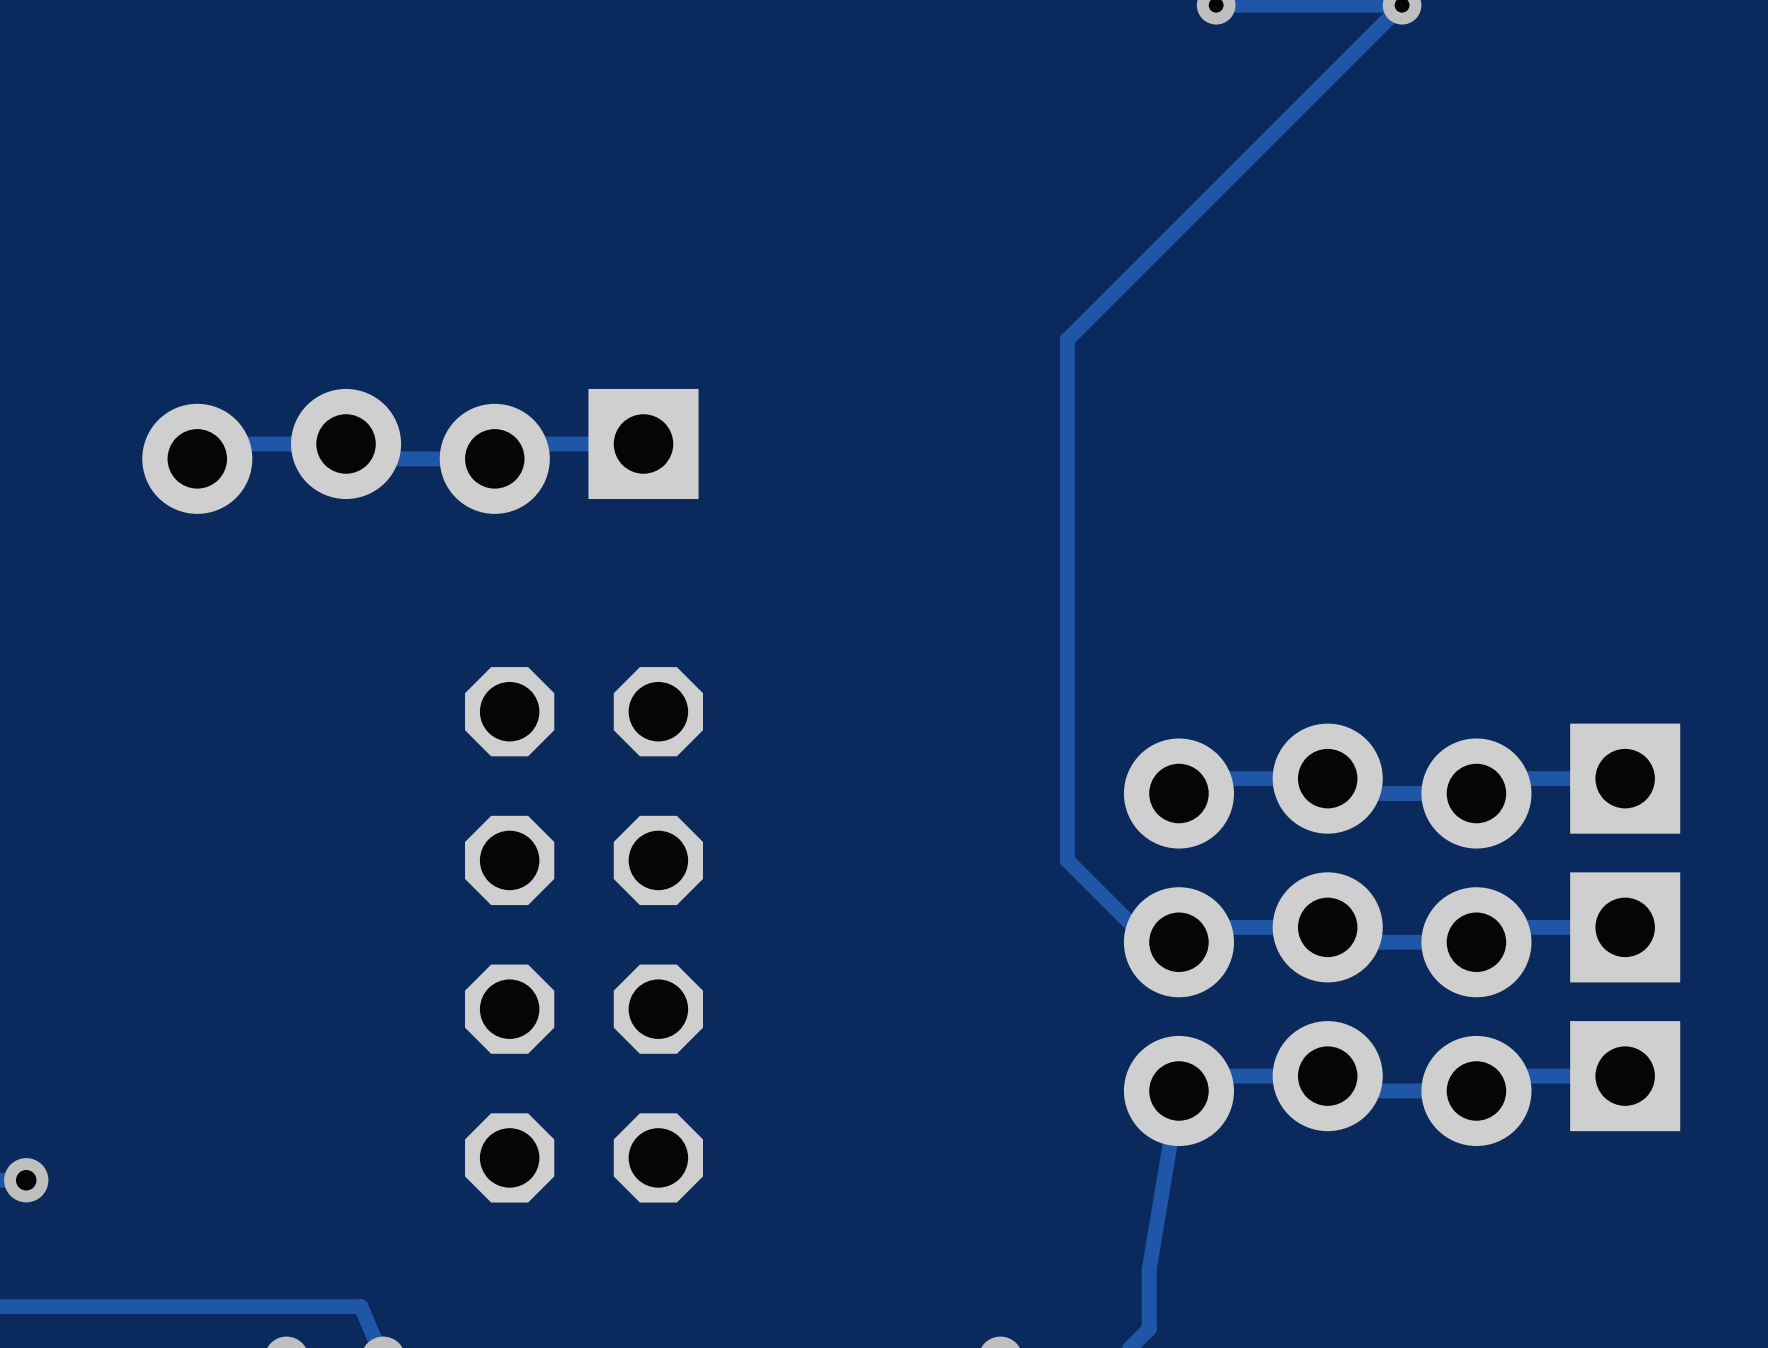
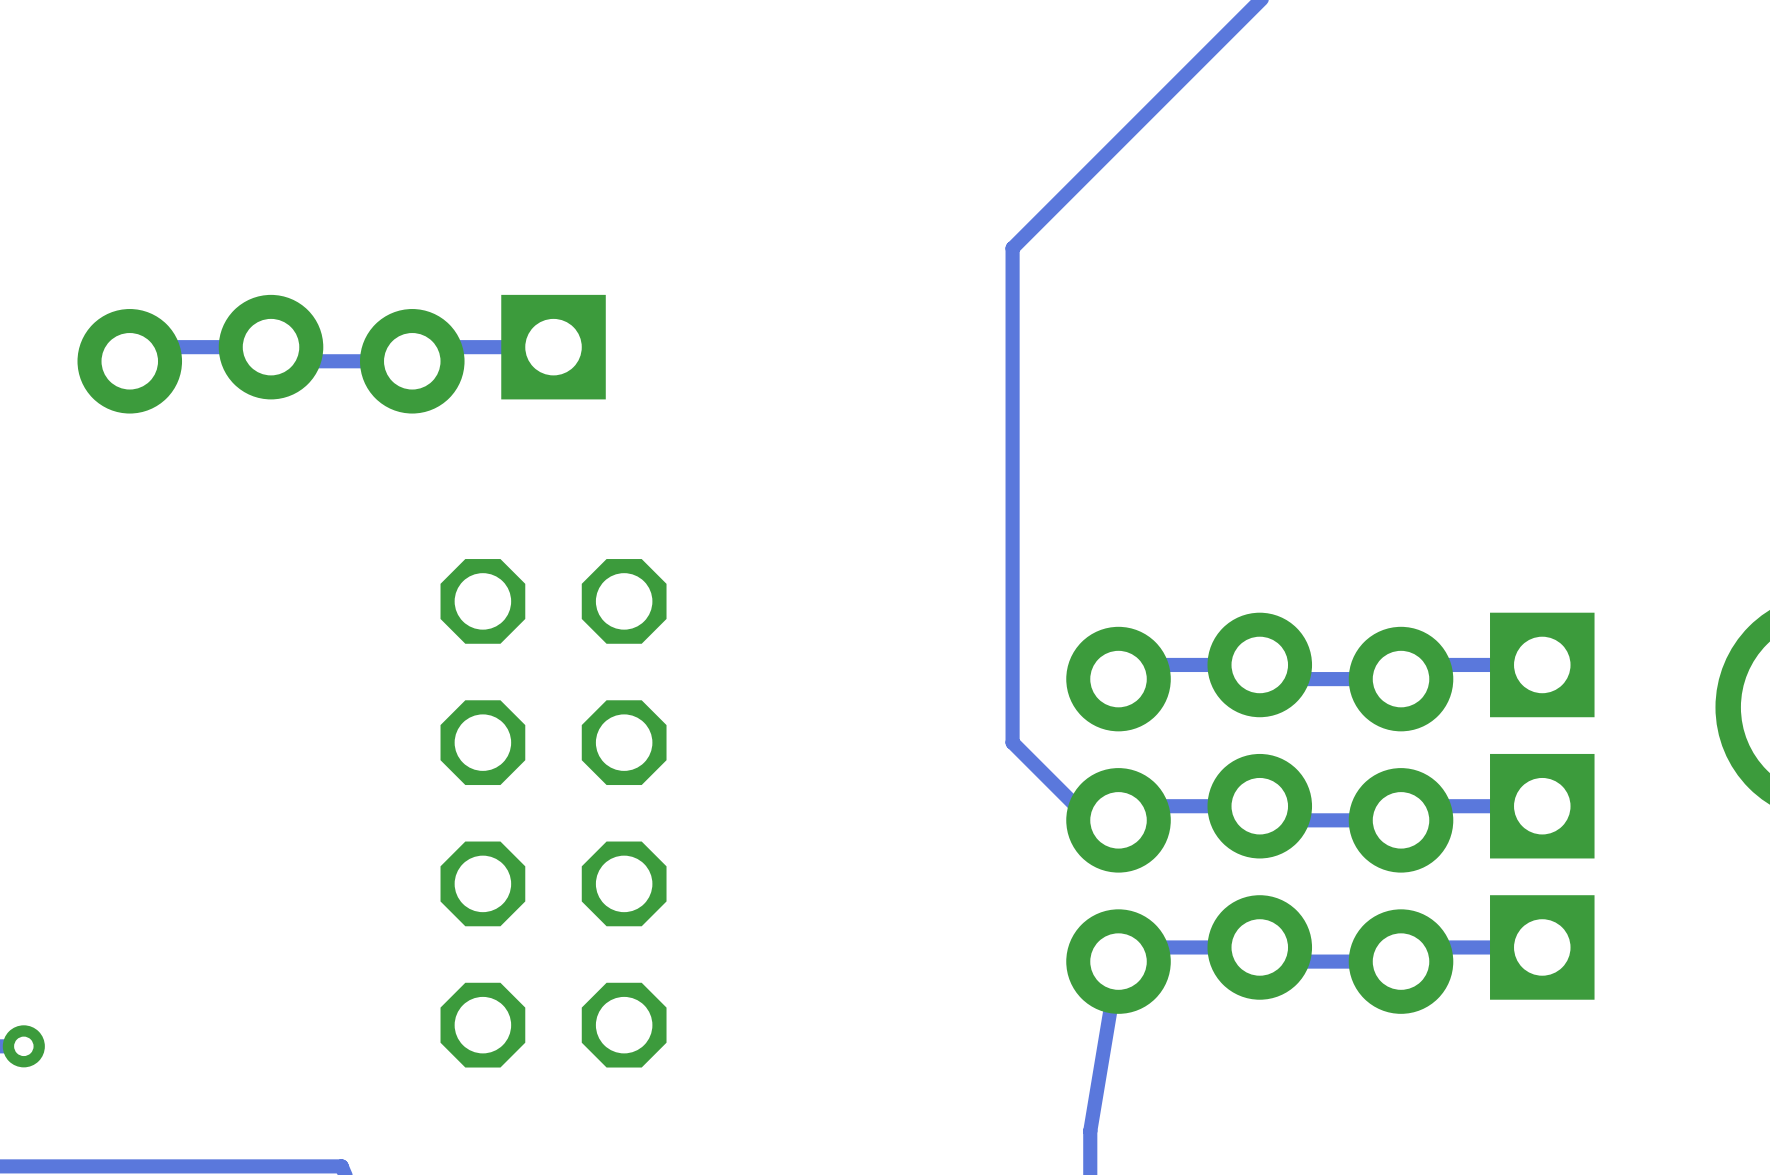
part position: (420, 451) -> (341, 354)

